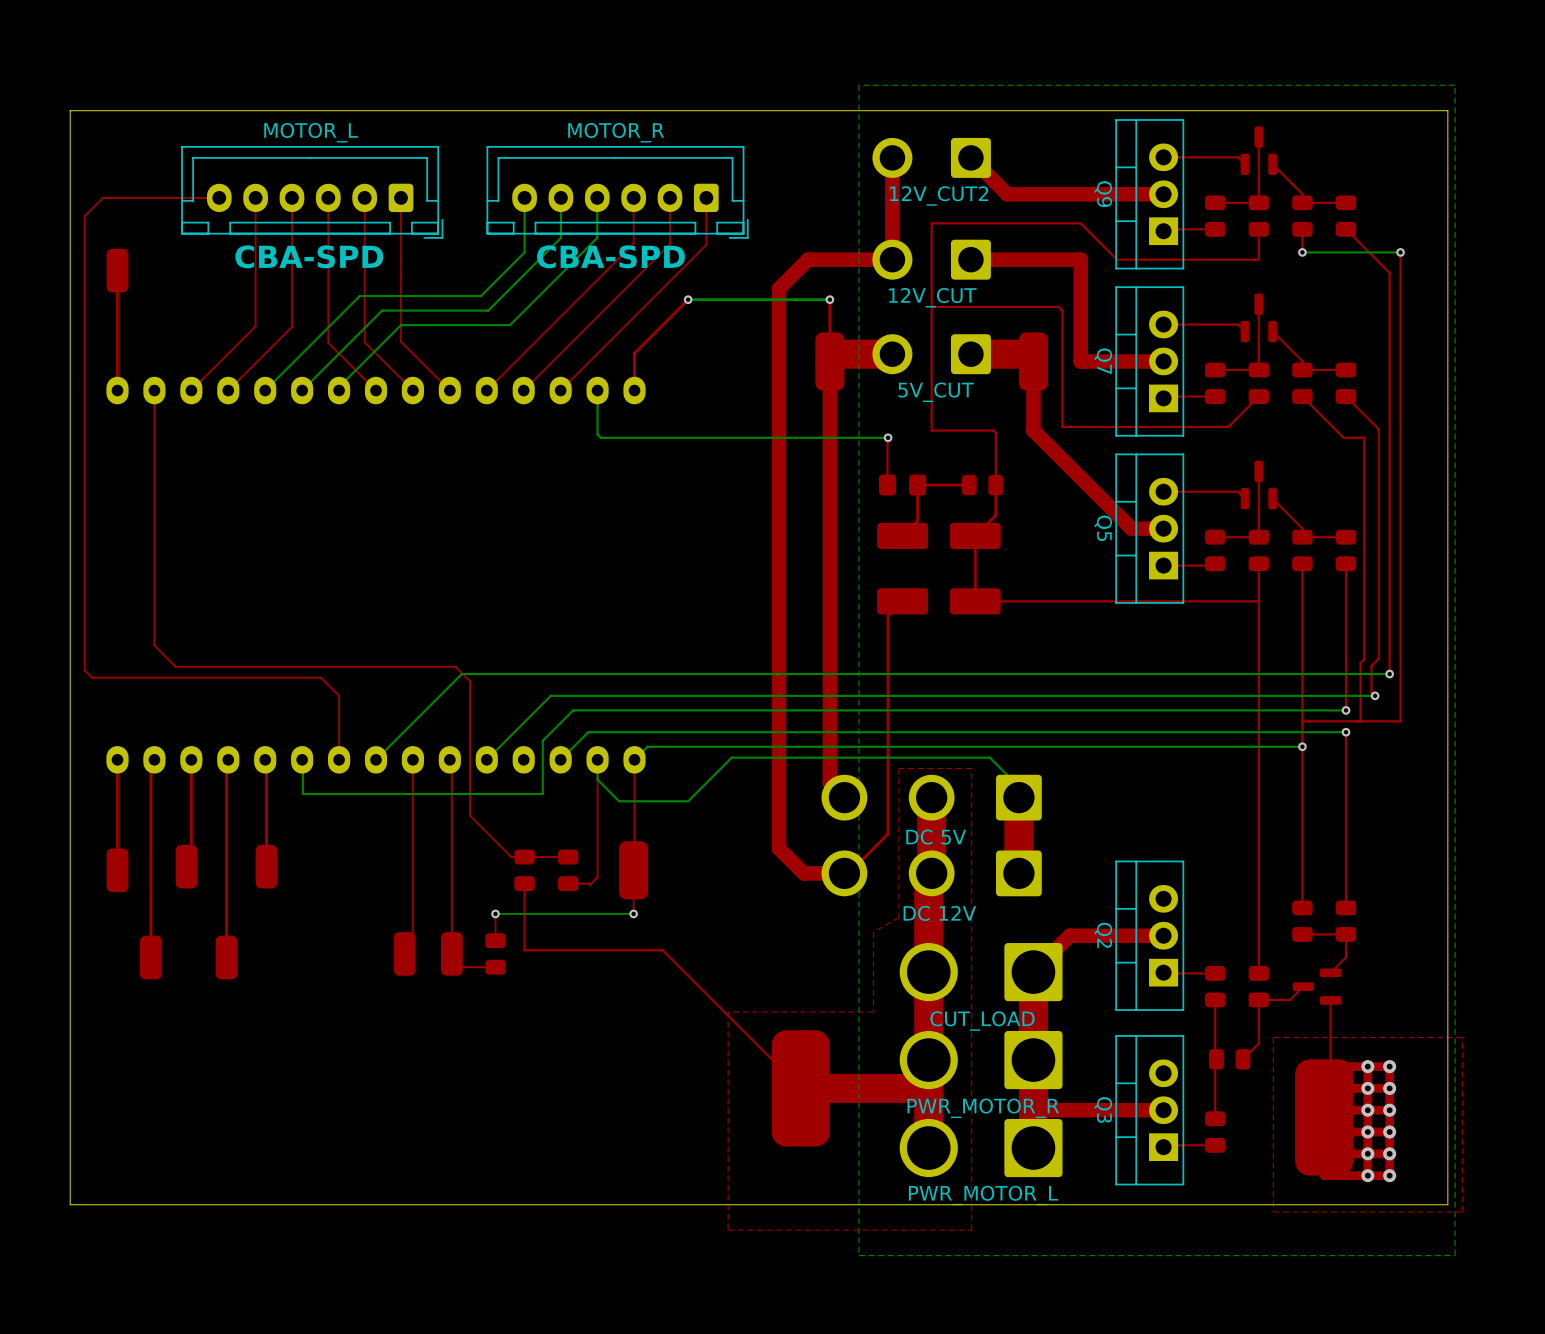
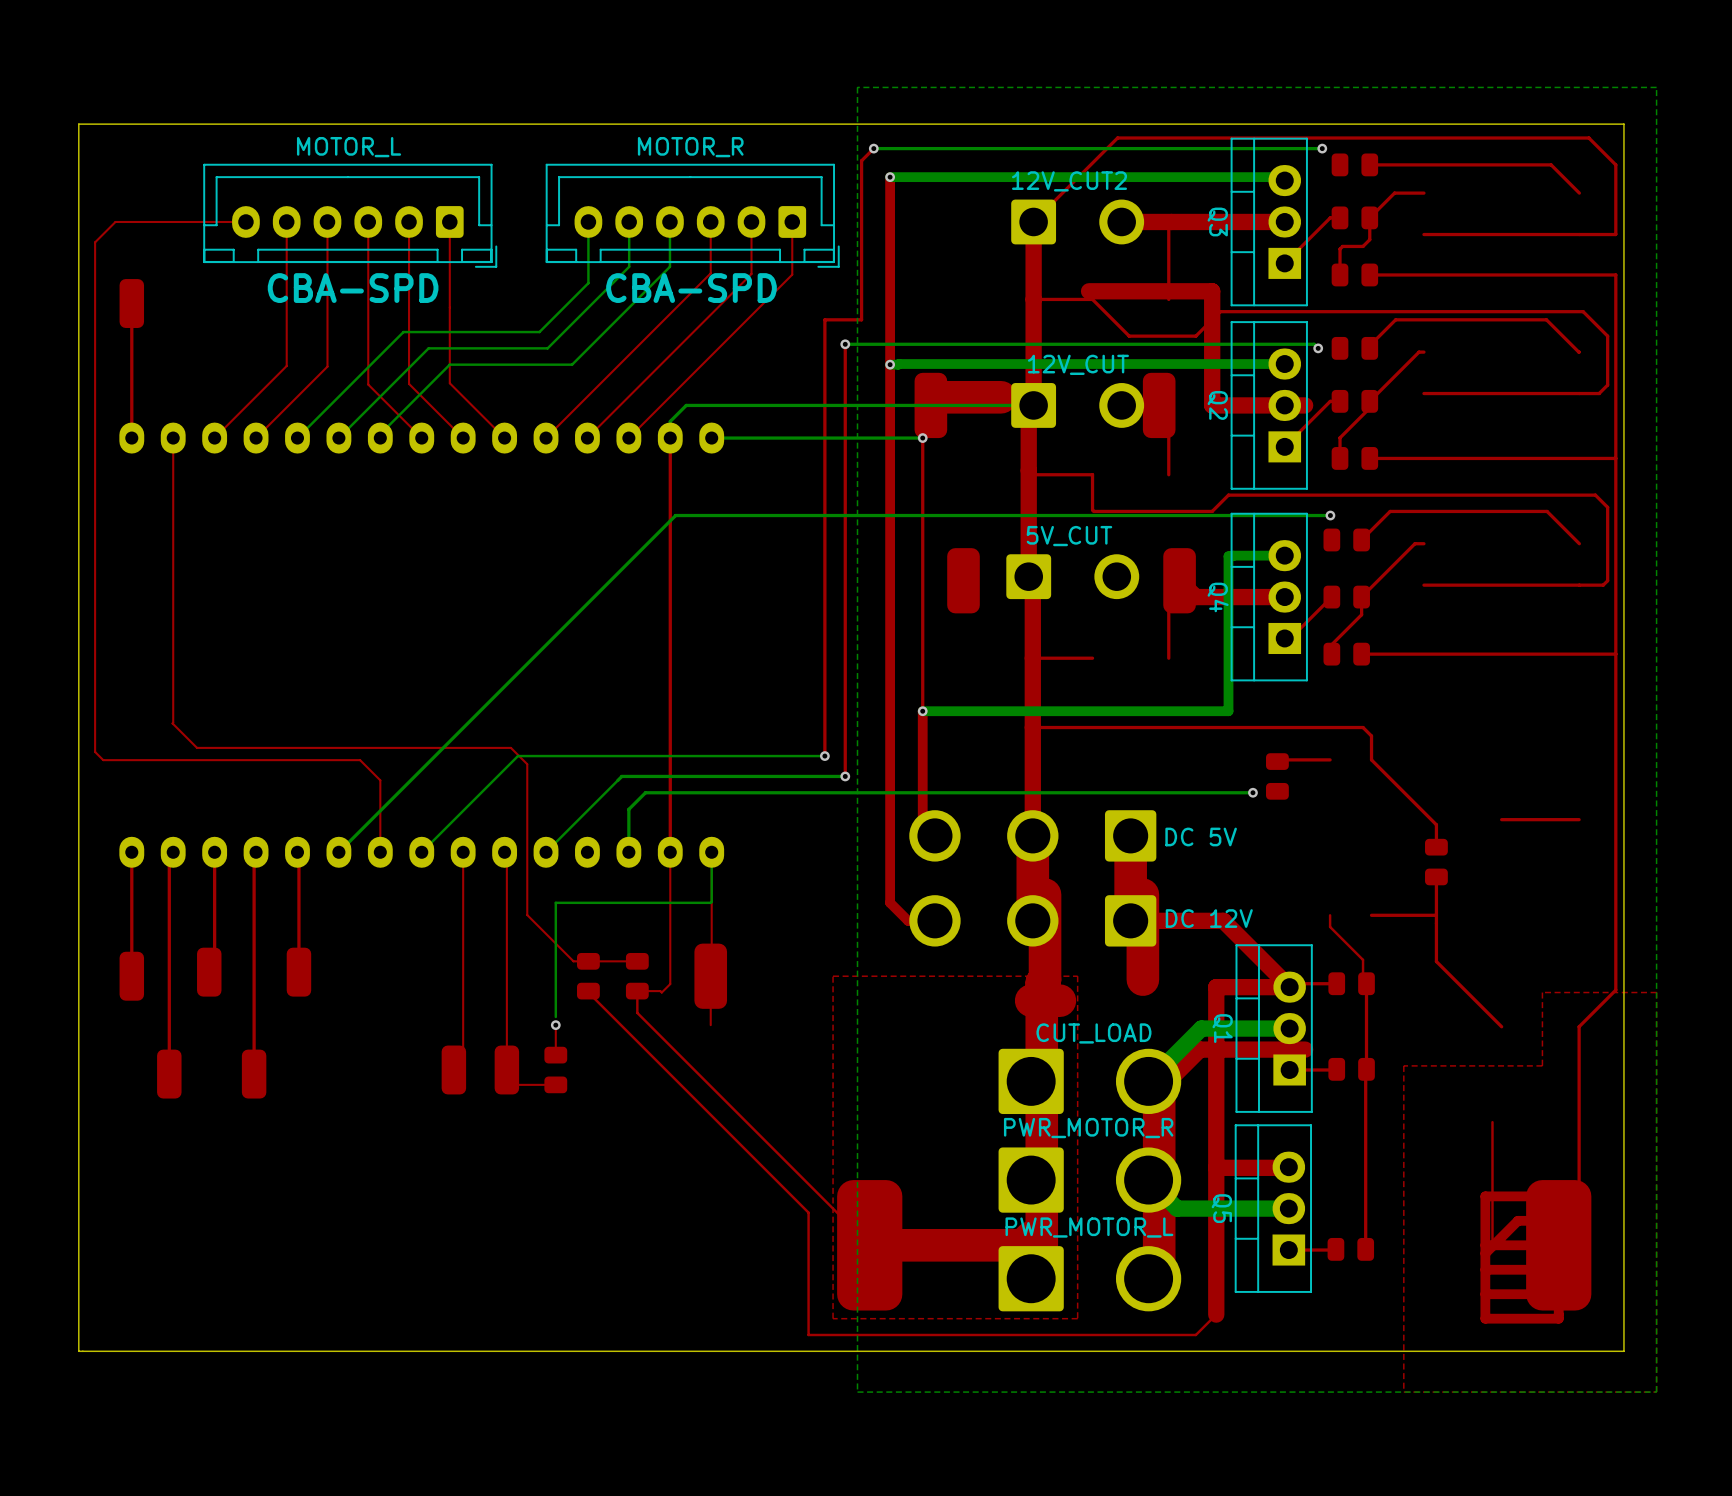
bottom zone outline: (1455, 85) (858, 85) (858, 1255) (1455, 1255) (1455, 85) -> (1656, 87) (1656, 1392) (857, 1392) (857, 87) (1656, 87)
top track: none -> (873, 148) (861, 160) (861, 319) (824, 319) (824, 756)
via: none -> (873, 148)
bottom track: none -> (1322, 148) (873, 148)
via: none -> (1322, 148)
top track: (1258, 137) (1258, 202) (1215, 202) -> none
part: none -> (1354, 164)
top track: none -> (1369, 164) (1551, 164) (1579, 193)
part: (1258, 150) -> none
top track: none -> (890, 177) (890, 902) (908, 920) (939, 920)
bottom track: none -> (890, 177) (1281, 177) (1284, 180)
via: none -> (890, 177)
top track: (892, 157) (892, 259) (808, 259) (779, 288) (779, 848) (803, 873) (848, 873) (888, 833) (888, 615) (902, 601) -> none
part rotation: 0° (931, 157) -> 180° (1077, 221)
top track: (968, 157) (970, 157) (1007, 194) (1163, 194) -> none
top track: (1163, 157) (1238, 157) (1244, 164) -> none
top track: (1272, 164) (1302, 194) (1302, 202) (1346, 202) -> none
top track: none -> (1423, 193) (1394, 193) (1369, 217) (1369, 239) (1363, 246) (1342, 246) (1340, 249) (1340, 274)
Q9: (1149, 194) -> none
top track: none -> (1340, 217) (1330, 217) (1284, 263)
part: none -> (1354, 217)
top track: none -> (1033, 221) (1117, 138) (1588, 138) (1615, 164) (1615, 234) (1423, 234)
top track: none -> (1033, 221) (1033, 405)
top track: none -> (1171, 221) (1168, 224) (1168, 299)
top track: none -> (1284, 221) (1121, 221)
part: (1215, 216) -> none
part: (1258, 216) -> none
part: (1302, 216) -> none
part: (1346, 216) -> none
top track: (1215, 229) (1165, 229) (1163, 231) -> none
top track: (1258, 229) (1258, 259) (1117, 259) (1080, 223) (931, 223) (931, 430) (993, 430) (995, 432) (995, 515) (975, 535) (975, 601) (1258, 601) -> none
top track: (1302, 229) (1302, 252) -> none
top track: (1346, 229) (1389, 272) (1389, 674) -> none
part: none -> (1354, 274)
top track: none -> (1369, 274) (1615, 274) (1615, 990) (1579, 1026) (1579, 1224) (1558, 1245)
via: (1302, 252) -> none
top track: (1400, 252) (1400, 721) (1302, 721) -> none
bottom track: (1400, 252) (1302, 252) -> none
via: (1400, 252) -> none
part rotation: 0° (931, 259) -> 180° (1077, 405)
part position: (931, 259) -> (1077, 405)
top track: none -> (1033, 299) (1092, 299) (1129, 336) (1195, 336) (1220, 311) (1583, 311) (1607, 336) (1607, 385) (1599, 393) (1423, 393)
top track: (688, 299) (634, 353) (634, 390) -> none
via: (688, 299) -> none
top track: (829, 299) (829, 783) (844, 797) -> none
bottom track: (829, 299) (688, 299) -> none
via: (829, 299) -> none
top track: (1258, 304) (1258, 370) (1215, 370) -> none
top track: none -> (845, 344) (845, 776)
bottom track: none -> (845, 344) (1314, 344) (1318, 348)
via: none -> (845, 344)
top track: (931, 306) (1058, 306) (1062, 310) (1062, 426) (1228, 426) (1258, 396) -> none
via: none -> (1318, 348)
part: none -> (1354, 348)
top track: none -> (1369, 348) (1369, 345) (1395, 319) (1546, 319) (1579, 352)
top track: none -> (1423, 352) (1419, 352) (1369, 401) (1369, 408) (1340, 437) (1340, 458)
part: (1258, 317) -> none
bottom track: none -> (1284, 364) (890, 364)
top track: (1163, 324) (1238, 324) (1244, 331) -> none
via: none -> (890, 364)
top track: (1272, 331) (1302, 361) (1302, 370) (1346, 370) -> none
part rotation: 0° (931, 354) -> 180° (1072, 576)
part position: (931, 354) -> (1072, 576)
top track: (970, 354) (1026, 354) (1033, 361) (1033, 430) (1131, 528) (1163, 528) -> none
top track: none -> (1340, 401) (1330, 401) (1284, 446)
part: none -> (1354, 401)
top track: none -> (1033, 405) (1028, 410) (1028, 576)
top track: none -> (1163, 405) (1168, 410) (1168, 474)
Q7: (1149, 361) -> none
part: (1215, 383) -> none
part: (1258, 383) -> none
part: (1302, 383) -> none
part: (1346, 383) -> none
top track: none -> (670, 438) (670, 852)
bottom track: (597, 390) (597, 434) (600, 437) (888, 437) -> (670, 438) (670, 421) (686, 405) (1033, 405)
top track: none -> (922, 438) (922, 823) (934, 835)
bottom track: none -> (922, 438) (711, 438)
via: none -> (922, 438)
top track: (1215, 396) (1165, 396) (1163, 398) -> none
top track: (1302, 396) (1343, 437) (1364, 437) (1364, 659) (1360, 663) (1360, 721) -> none
top track: (1346, 396) (1378, 429) (1378, 658) (1371, 665) (1371, 692) (1375, 695) -> none
part: none -> (1354, 458)
top track: none -> (1615, 458) (1369, 458)
top track: none -> (1028, 470) (1032, 474) (1092, 474) (1093, 511) (1212, 511) (1228, 495) (1595, 495) (1607, 507) (1607, 580) (1603, 585) (1423, 585)
top track: (888, 437) (887, 485) -> none
via: (888, 437) -> none
via: none -> (1330, 515)
top track: (1258, 471) (1258, 537) (1215, 537) -> none
part: none -> (1346, 539)
top track: none -> (1361, 539) (1390, 511) (1547, 511) (1579, 543)
top track: none -> (1423, 543) (1414, 543) (1361, 597) (1361, 614) (1331, 644) (1331, 654)
part: (902, 485) -> none
top track: (969, 485) (917, 485) (917, 520) (902, 535) -> none
part: (982, 485) -> none
part: (1258, 485) -> none
top track: (1163, 491) (1238, 491) (1244, 498) -> none
bottom track: none -> (1284, 555) (1228, 556) (1228, 711) (922, 711)
top track: (1272, 498) (1302, 528) (1302, 537) (1346, 537) -> none
top track: none -> (1028, 576) (1032, 580) (1032, 920) (1035, 923)
part: none -> (963, 580)
part: none -> (1179, 580)
Q5 position: (1149, 528) -> (1273, 1208)
Q4: none -> (1269, 597)
top track: none -> (1284, 597) (1195, 597) (1179, 580) (1168, 591) (1168, 658)
top track: none -> (1331, 597) (1290, 638) (1284, 638)
part: none -> (1346, 597)
part: (938, 535) -> none
part: (1215, 550) -> none
part: (1258, 550) -> none
part: (1302, 550) -> none
part: (1346, 550) -> none
top track: (1215, 563) (1213, 565) (1163, 565) -> none
top track: (1258, 563) (1258, 973) -> none
top track: (1302, 563) (1302, 907) -> none
top track: (1346, 563) (1346, 710) -> none
part: none -> (1346, 654)
top track: none -> (1615, 654) (1361, 654)
top track: none -> (1092, 658) (1032, 658)
part: (938, 601) -> none
via: none -> (922, 711)
top track: none -> (1032, 727) (1363, 727) (1371, 736) (1371, 759) (1436, 824) (1436, 847)
via: none -> (824, 756)
bottom track: (1389, 674) (735, 674) -> none
via: (1389, 674) -> none
top track: none -> (1330, 759) (1279, 759) (1277, 761)
via: none -> (845, 776)
part: none -> (1277, 776)
bottom track: (1375, 695) (550, 695) -> (845, 776) (621, 776) (617, 780)
via: (1375, 695) -> none
via: none -> (1252, 792)
bottom track: (1346, 710) (573, 710) (542, 740) (542, 793) (302, 793) (302, 759) -> (1330, 515) (675, 515) (338, 852)
via: (1346, 710) -> none
top track: none -> (1579, 819) (1501, 819)
top track: (1346, 732) (1346, 907) -> none
bottom track: (1346, 732) (588, 732) (560, 759) -> (1252, 792) (645, 792) (628, 809) (628, 852)
via: (1346, 732) -> none
top track: none -> (1130, 835) (1130, 920) (1223, 920) (1289, 987)
bottom track: (1302, 746) (647, 746) (634, 759) -> (555, 1016) (555, 902) (710, 902) (711, 852)
via: (1302, 746) -> none
bottom track: (597, 759) (597, 779) (619, 801) (688, 801) (731, 757) (989, 757) (1018, 786) (1018, 797) -> none
top zone outline: (971, 768) (898, 768) (898, 917) (873, 932) (873, 1012) (728, 1012) (728, 1230) (971, 1230) (971, 768) -> (1077, 976) (1077, 1318) (833, 1318) (833, 976) (1077, 976)
part: none -> (1436, 862)
top track: none -> (1436, 876) (1436, 961) (1501, 1026)
part position: (931, 797) -> (1032, 835)
top track: none -> (1436, 915) (1371, 915)
top track: none -> (1330, 915) (1330, 926) (1363, 959) (1363, 980) (1366, 983) (1365, 1249)
part value position: DC 5V (936, 837) -> DC 5V (1201, 836)
part position: (931, 873) -> (1032, 920)
top track: none -> (1336, 983) (1298, 983) (1295, 987) (1289, 987)
part: none -> (1351, 983)
top track: none -> (637, 991) (637, 1012) (869, 1245) (1023, 1245) (1031, 1237)
top track: (524, 884) (524, 950) (662, 950) (800, 1088) (928, 1088) -> (588, 992) (808, 1212) (808, 1334) (1195, 1334) (1216, 1314) (1216, 987) (1289, 987)
top zone outline: none -> (1656, 992) (1542, 992) (1542, 1065) (1403, 1065) (1403, 1392) (1656, 1392) (1656, 992)
top track: none -> (1059, 1000) (1031, 1000)
bottom track: (633, 913) (495, 913) -> none
via: (633, 913) -> none
part value position: DC 12V (939, 913) -> DC 12V (1209, 918)
Q1: none -> (1274, 1028)
bottom track: none -> (1289, 1028) (1201, 1028) (1148, 1081)
part: (1302, 921) -> none
part: (1346, 921) -> none
top track: (1302, 934) (1346, 934) (1346, 957) (1330, 972) -> none
Q2 position: (1149, 935) -> (1269, 405)
top track: none -> (1336, 1069) (1289, 1069)
part: none -> (1351, 1069)
part rotation: 0° (981, 972) -> 180° (1089, 1081)
top track: (1163, 972) (1215, 973) -> none
part: (1215, 986) -> none
part: (1258, 986) -> none
top track: (1303, 986) (1290, 999) (1258, 999) (1258, 1043) (1242, 1059) -> none
part: (1316, 986) -> none
top track: (1215, 999) (1215, 1118) -> none
top zone outline: (1462, 1037) (1273, 1037) (1273, 1211) (1462, 1211) (1462, 1037) -> none
top track: none -> (1288, 1167) (1216, 1167)
bottom track: none -> (1148, 1180) (1177, 1208) (1288, 1208)
part: (1229, 1059) -> none
part rotation: 0° (981, 1060) -> 180° (1089, 1180)
top track: (1367, 1066) (1367, 1175) -> none
via: (1367, 1066) -> none
via: (1389, 1066) -> none
part position: (800, 1088) -> (869, 1245)
via: (1367, 1088) -> none
via: (1389, 1088) -> none
Q3 position: (1149, 1110) -> (1269, 221)
top track: (1163, 1110) (1033, 1110) -> none
via: (1367, 1110) -> none
via: (1389, 1110) -> none
top track: none -> (1335, 1249) (1288, 1250)
part position: (1324, 1117) -> (1558, 1245)
part rotation: 0° (1215, 1132) -> 90° clockwise (1350, 1249)
via: (1367, 1132) -> none
via: (1389, 1132) -> none
top track: (1215, 1145) (1165, 1145) (1163, 1147) -> none
part rotation: 0° (981, 1148) -> 180° (1089, 1278)
via: (1367, 1153) -> none
via: (1389, 1153) -> none
via: (1367, 1175) -> none
via: (1389, 1175) -> none

